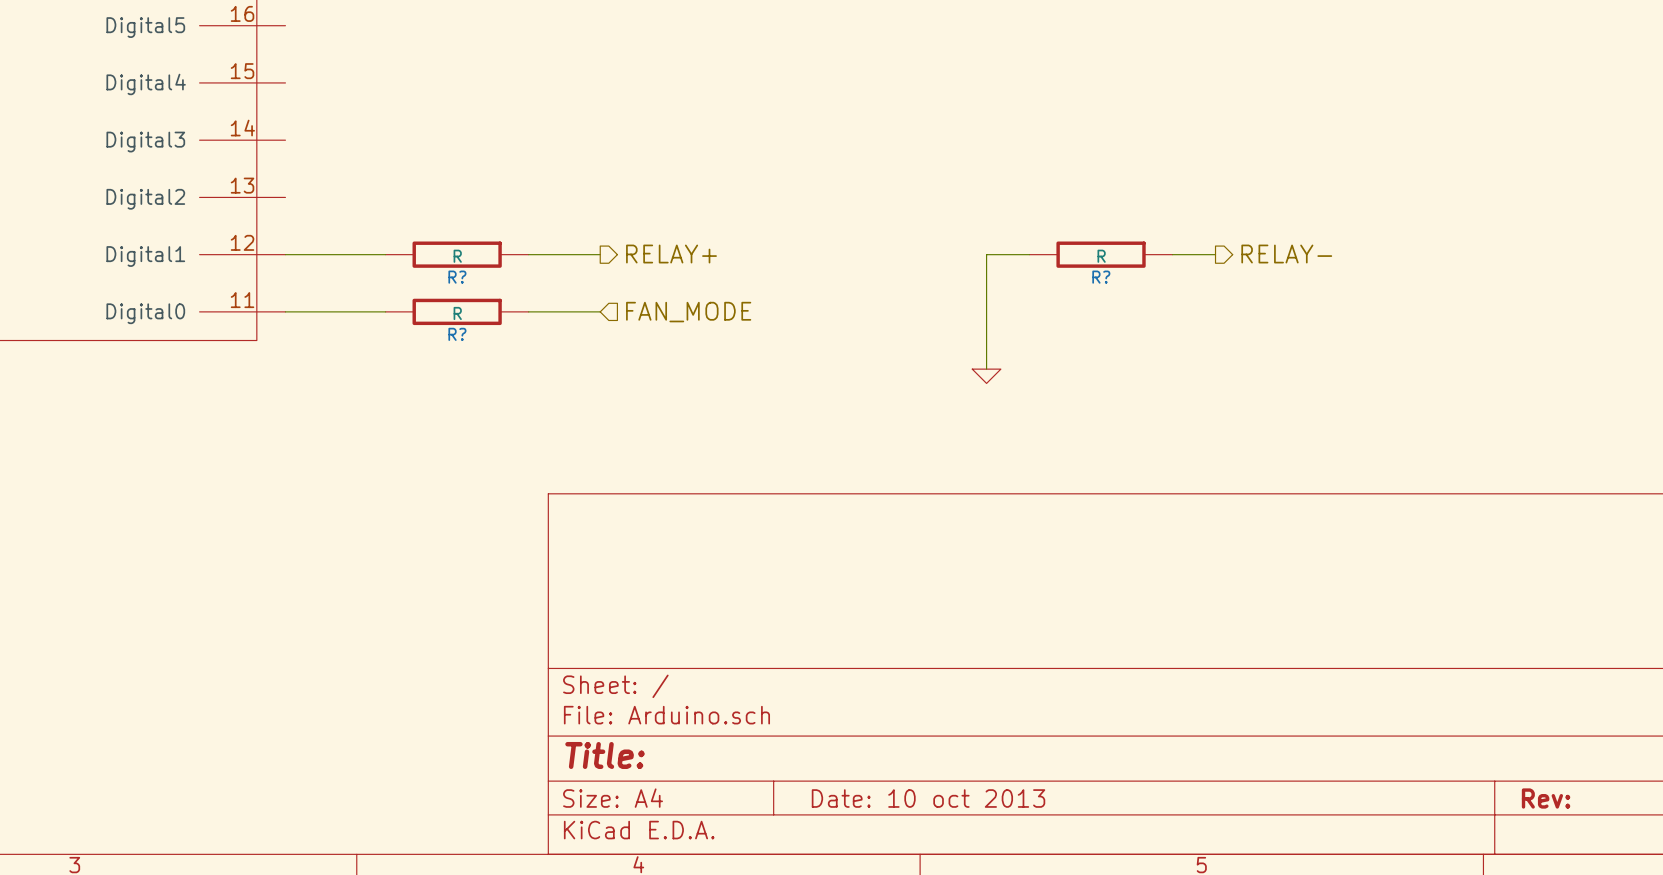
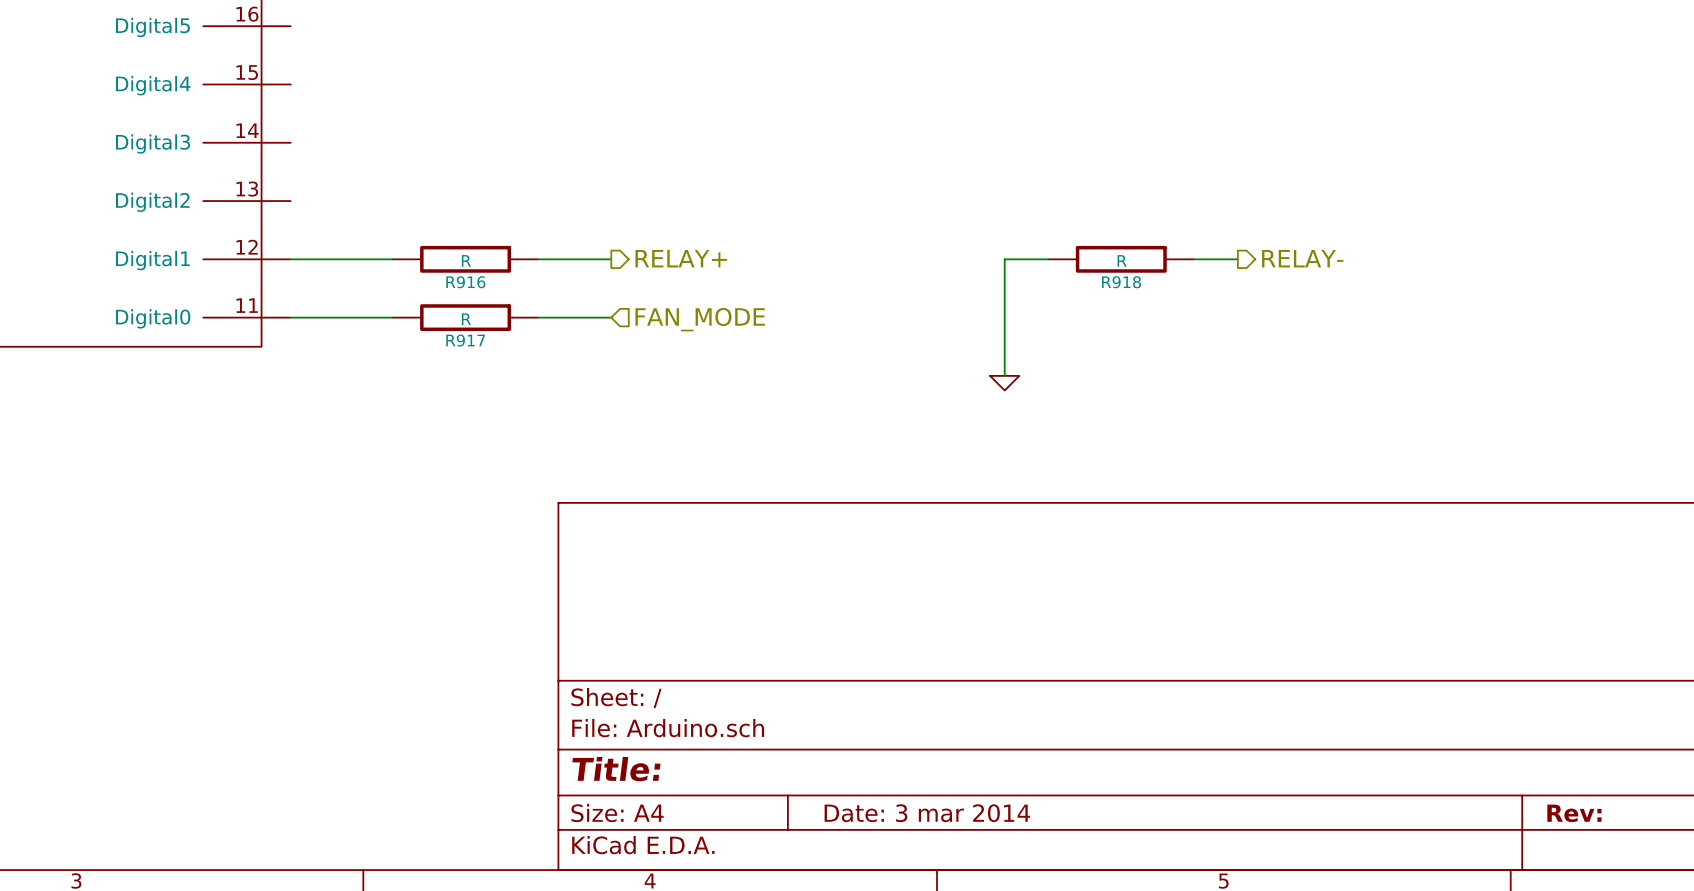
R? name: R? (457, 277) -> R916 (465, 282)
R? name: R? (1101, 277) -> R918 (1121, 282)
R? name: R? (457, 334) -> R917 (465, 340)
title block: Date: 10 oct 2013 (928, 798) -> Date: 3 mar 2014 (927, 813)

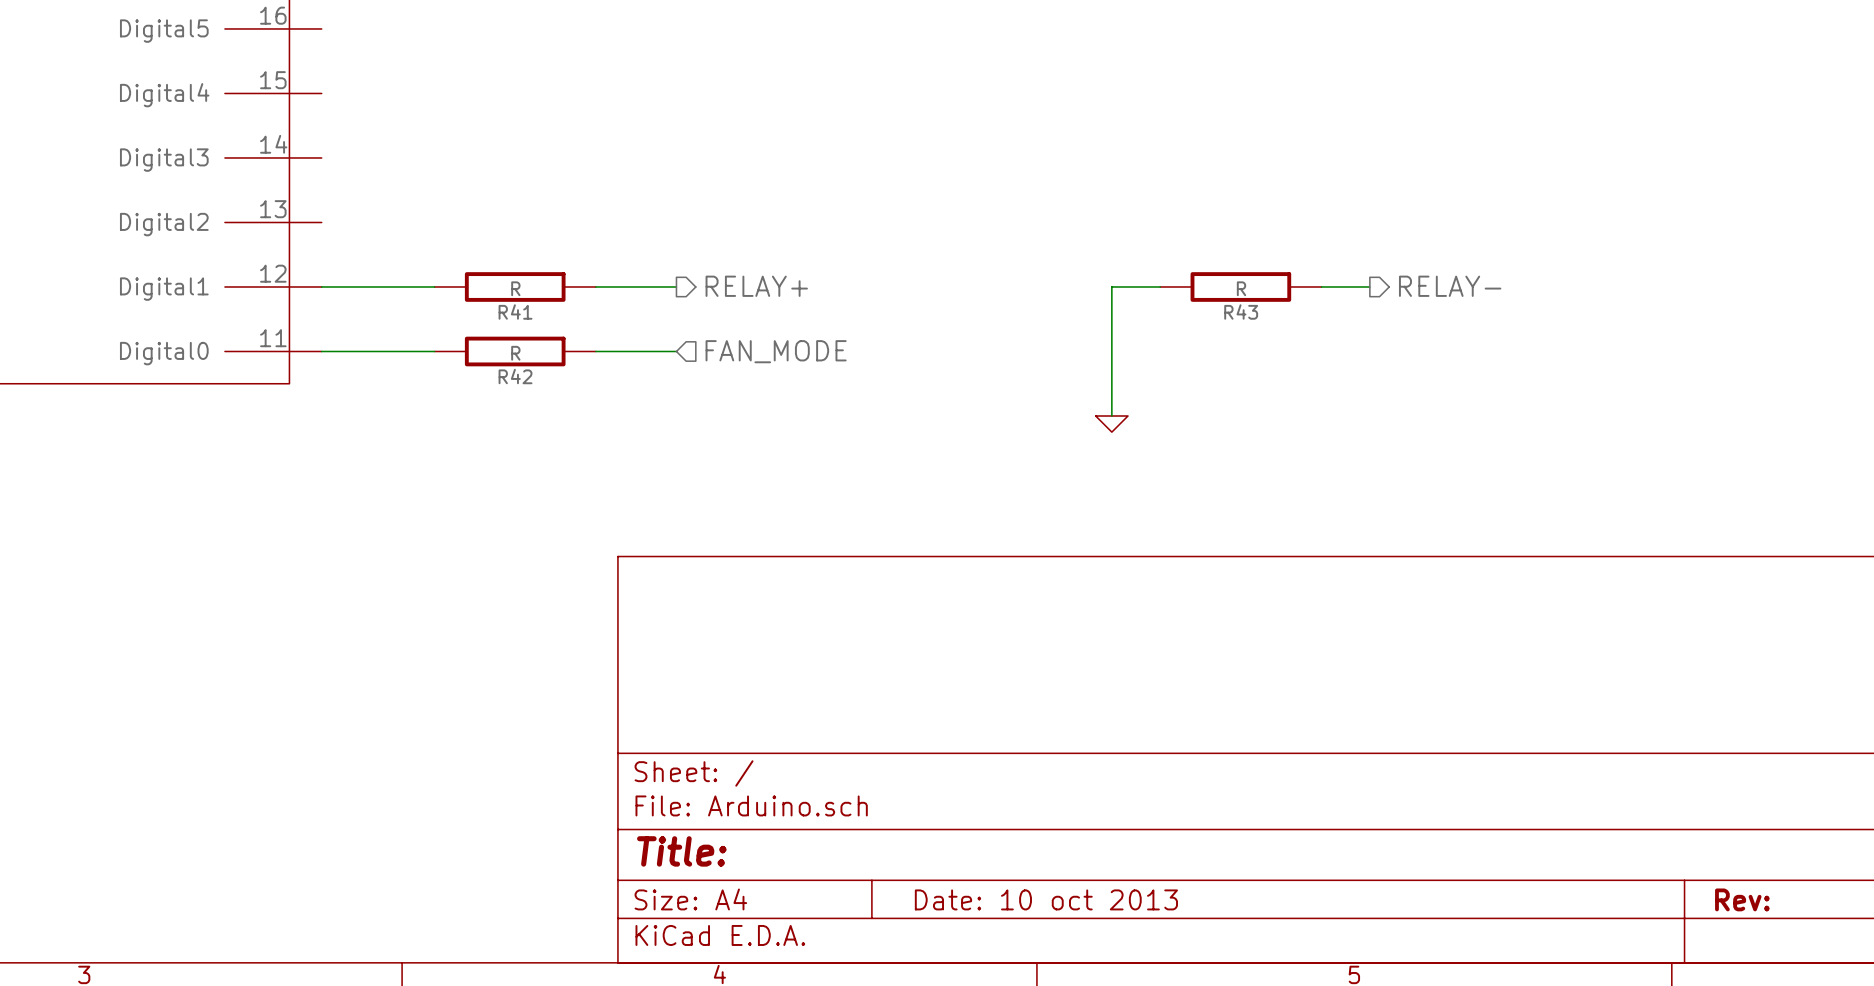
R916 name: R916 (465, 282) -> R41 (515, 312)
R918 name: R918 (1121, 282) -> R43 (1241, 312)
R917 name: R917 (465, 340) -> R42 (515, 376)
title block: Date: 3 mar 2014 (927, 813) -> Date: 10 oct 2013 (1046, 899)

